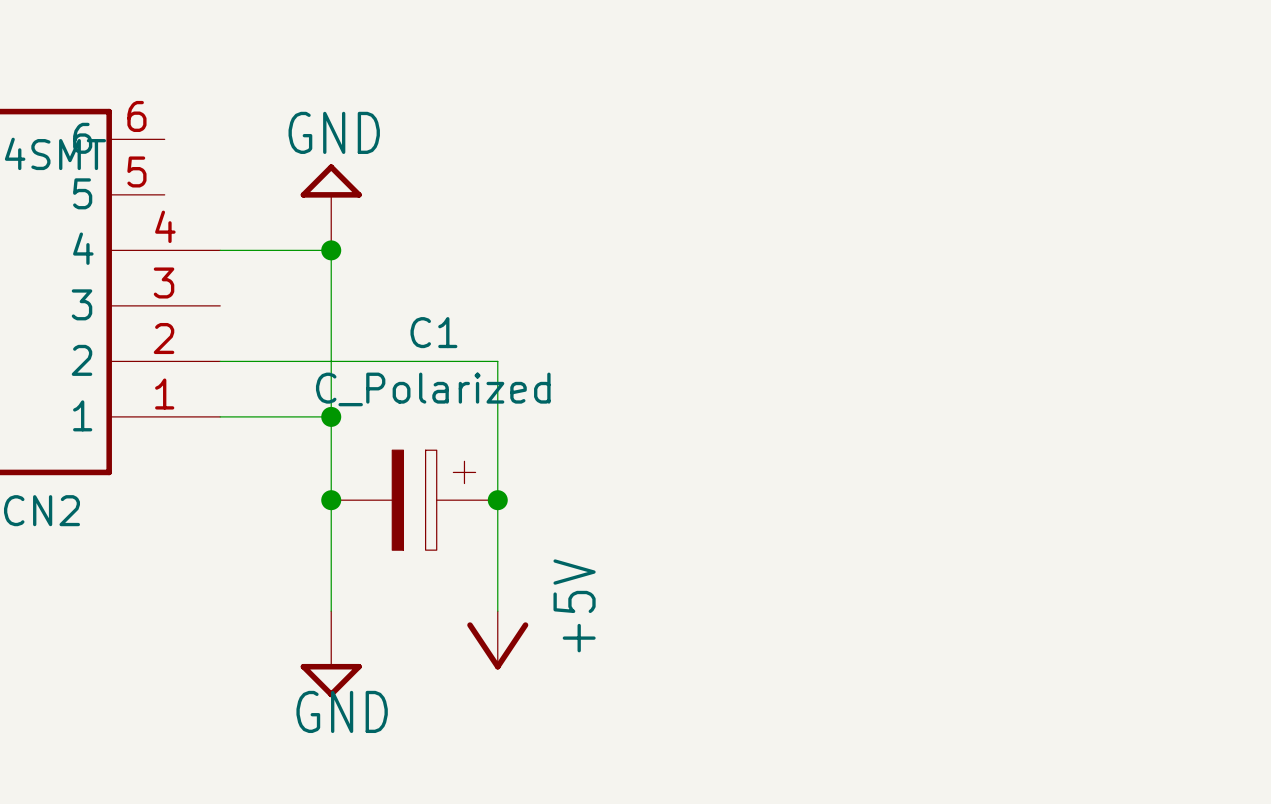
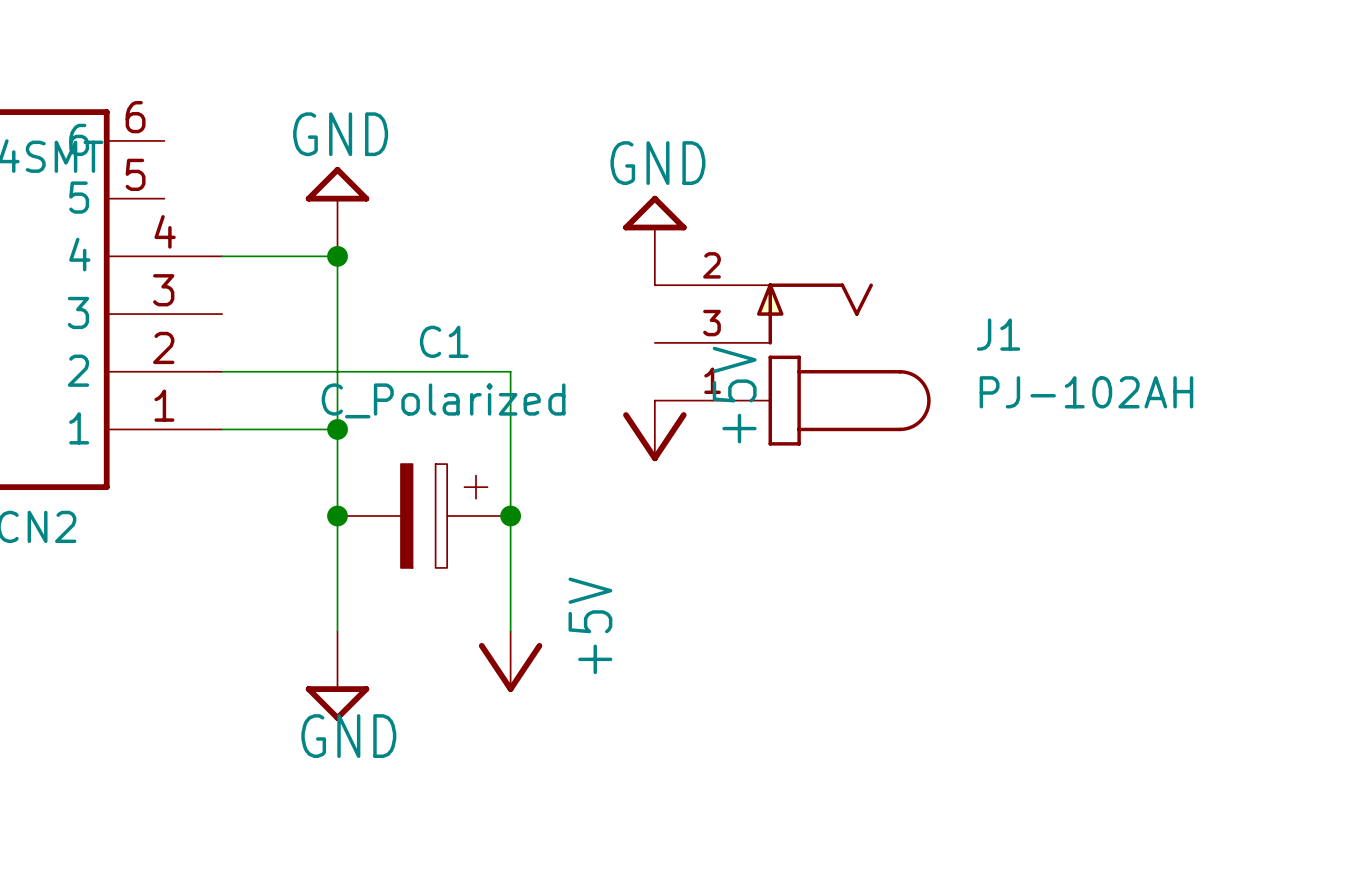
power symbol: none -> GND (654, 240)
J1: none -> PJ-102AH (792, 364)
power symbol: none -> +5V (654, 430)

